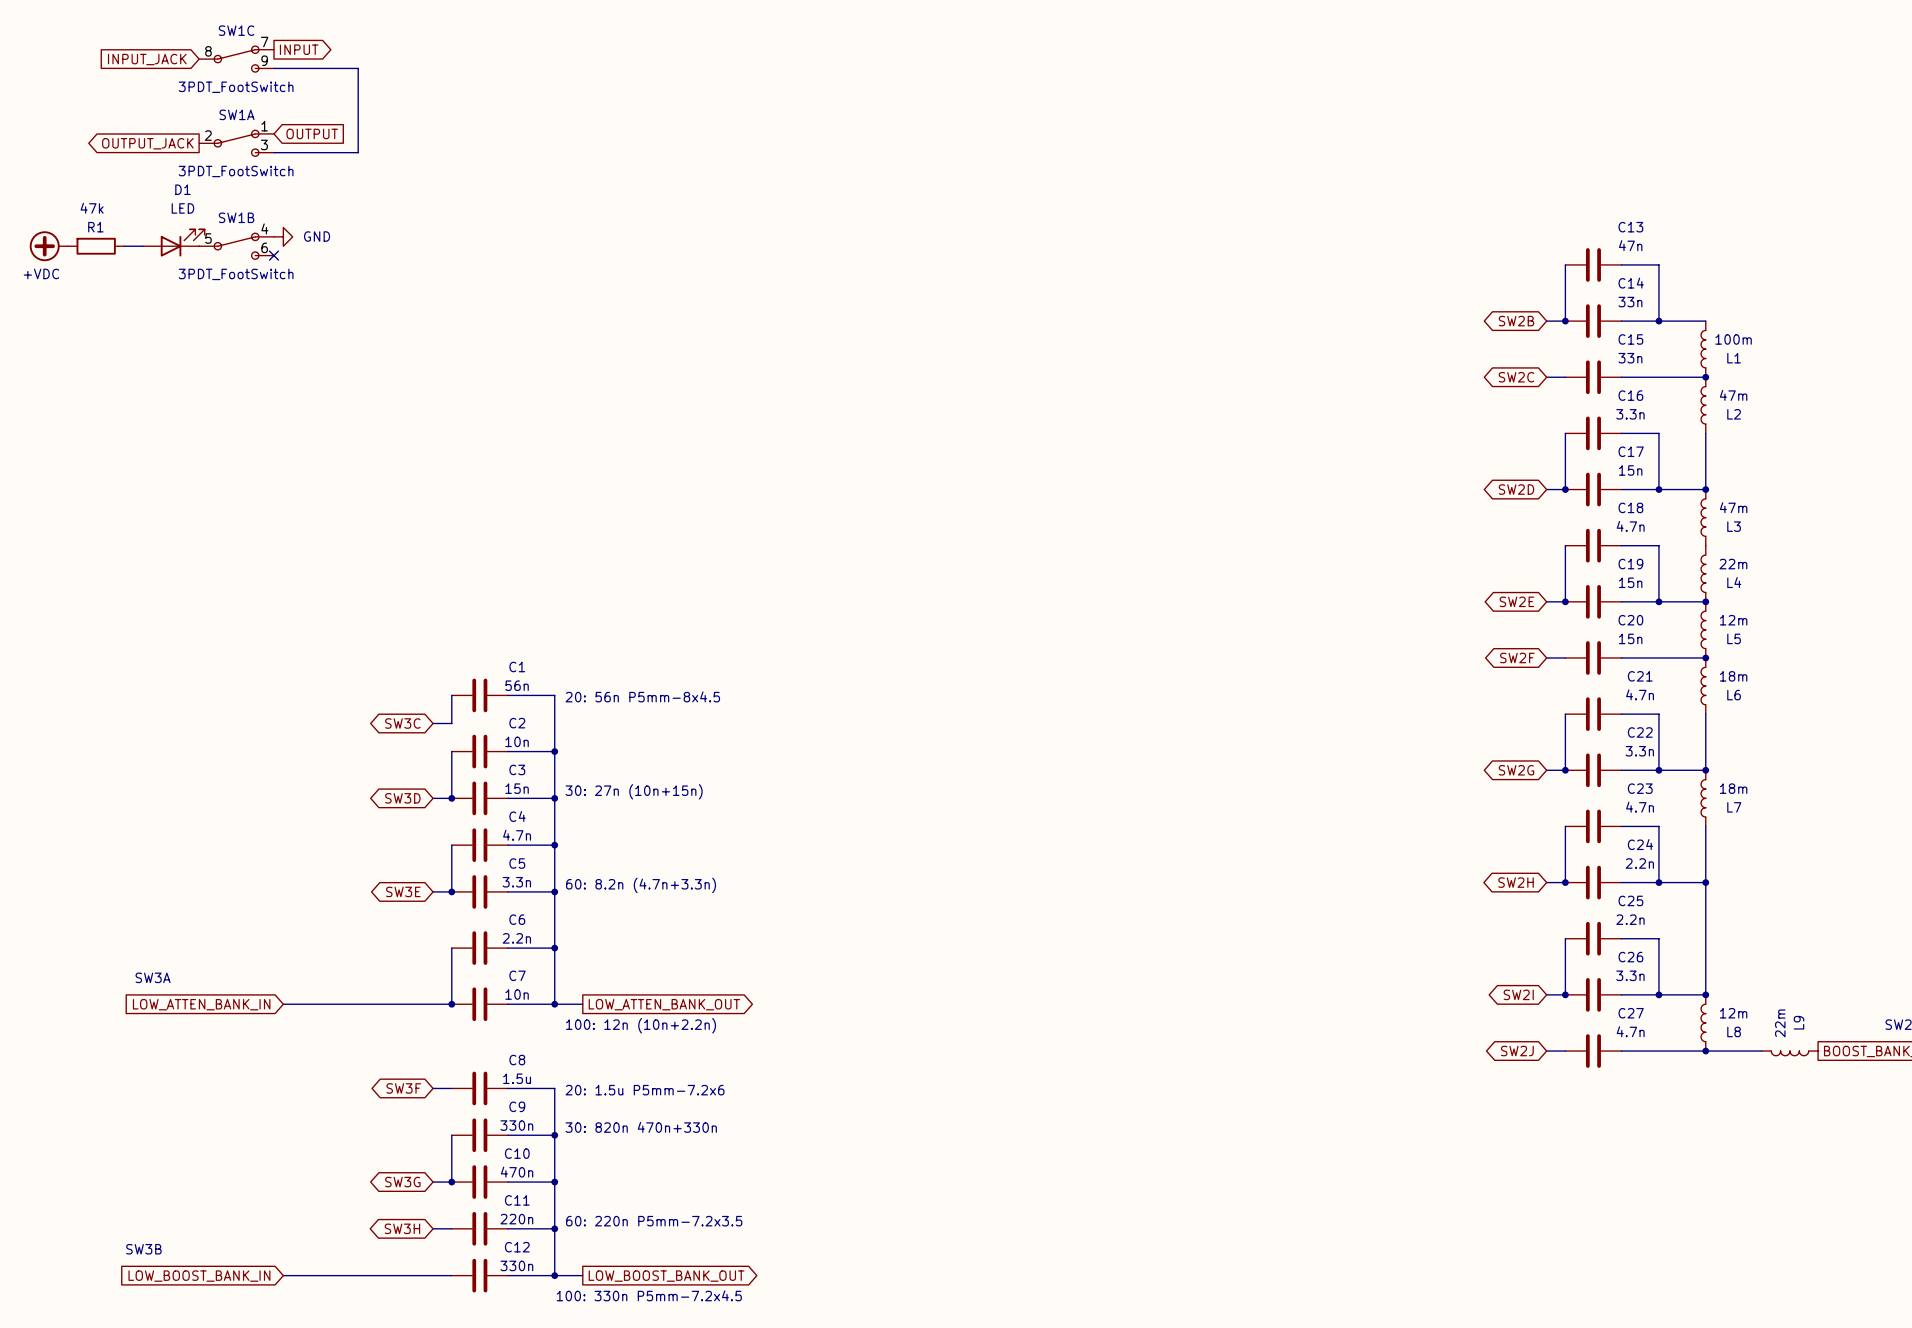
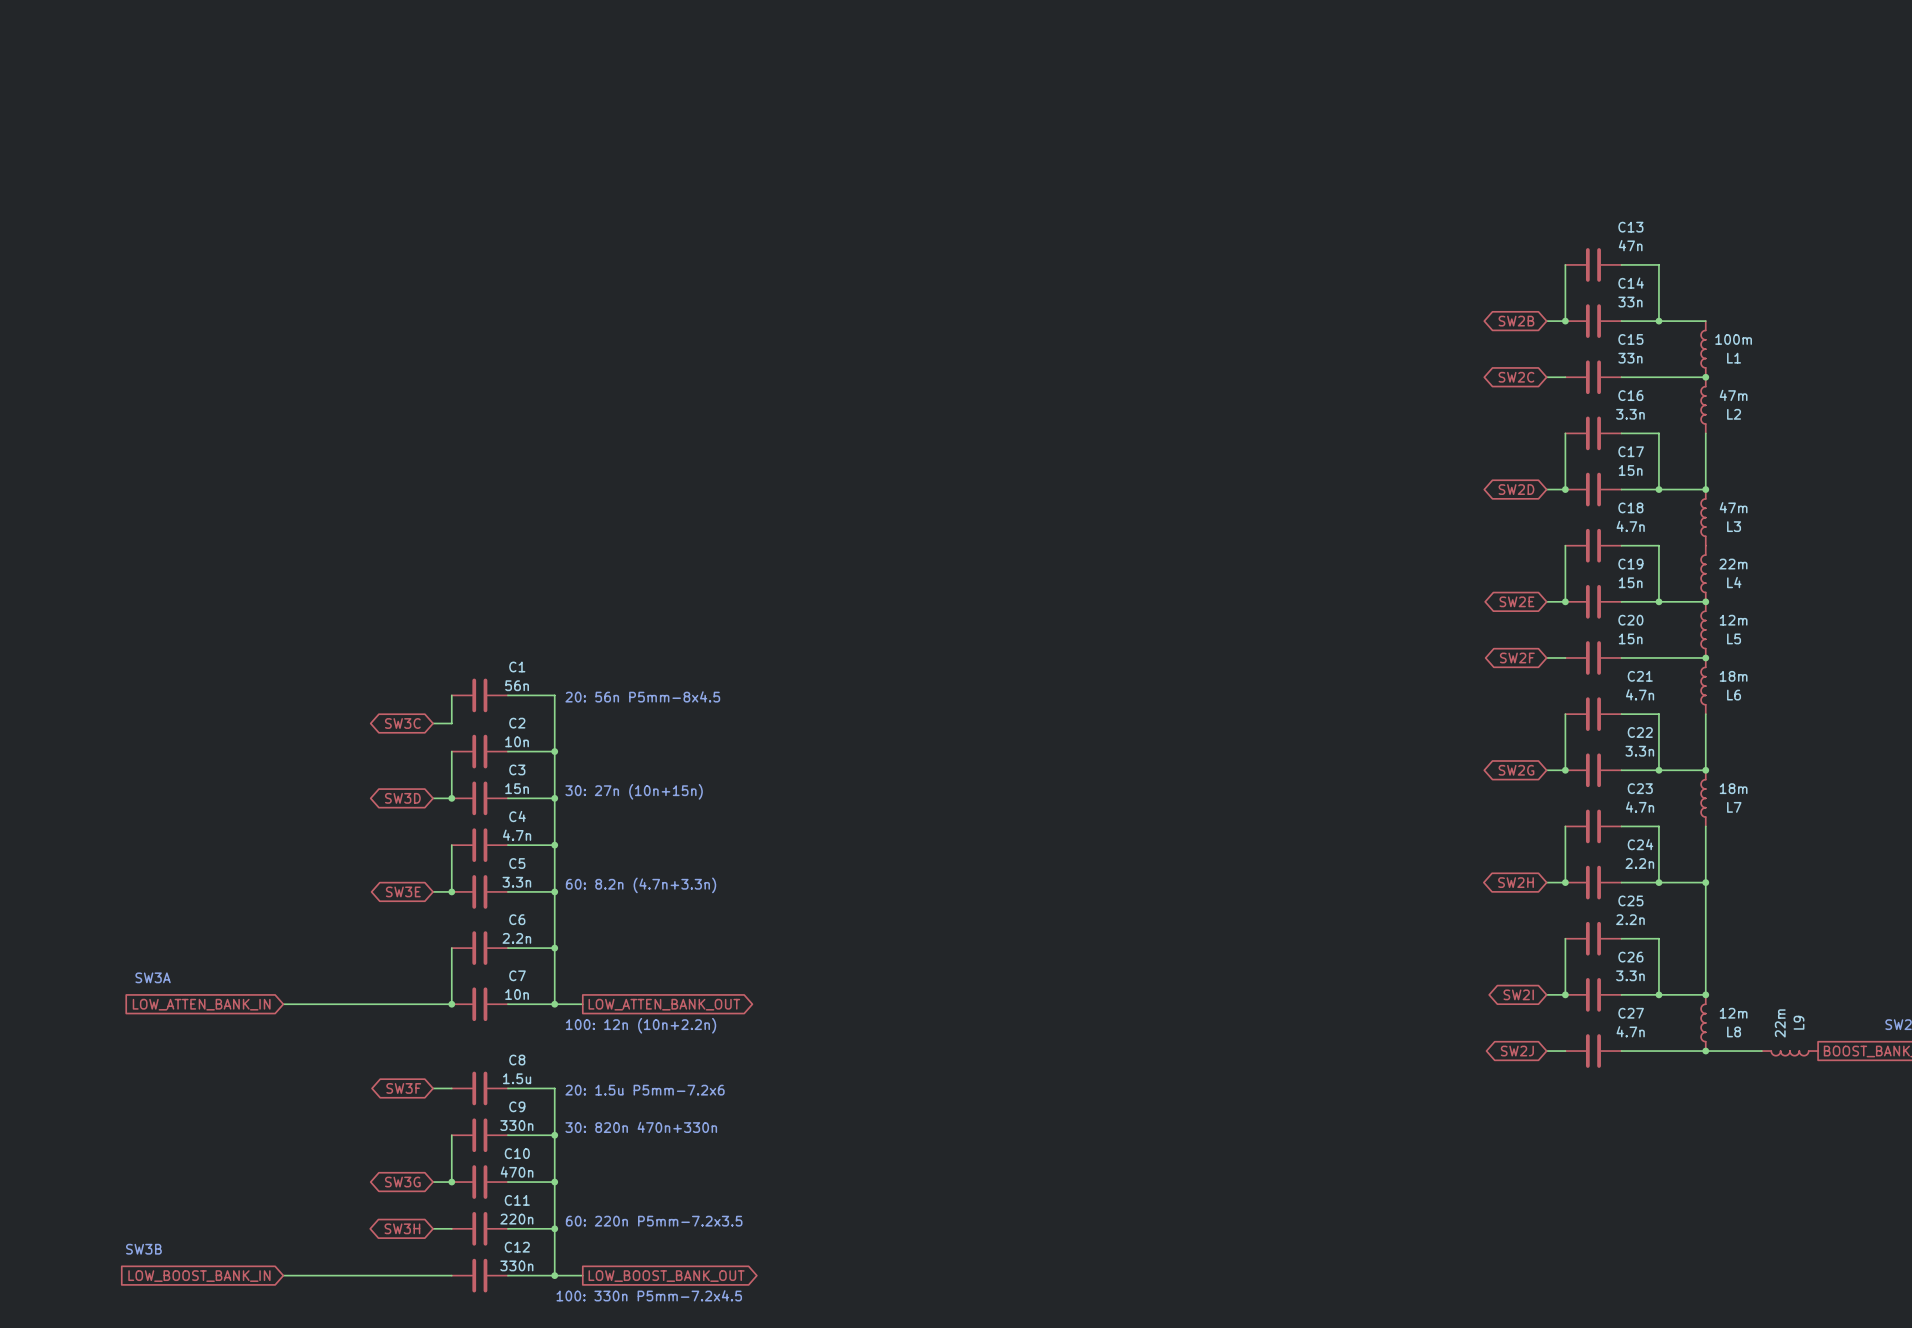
global label: INPUT (299, 49) -> none
global label: INPUT_JACK (147, 59) -> none
SW1C: 3PDT_FootSwitch (236, 59) -> none
wire: (273, 68) (358, 68) (358, 152) (273, 152) -> none
global label: OUTPUT (312, 133) -> none
global label: OUTPUT_JACK (147, 143) -> none
SW1A: 3PDT_FootSwitch (236, 143) -> none
power symbol: GND (283, 236) -> none
D1: LED (173, 242) -> none
power symbol: +VDC (48, 246) -> none
R1: 47k (96, 246) -> none
wire: (124, 246) (142, 246) -> none
SW1B: 3PDT_FootSwitch (236, 246) -> none
no-connect mark: (273, 255) -> none

